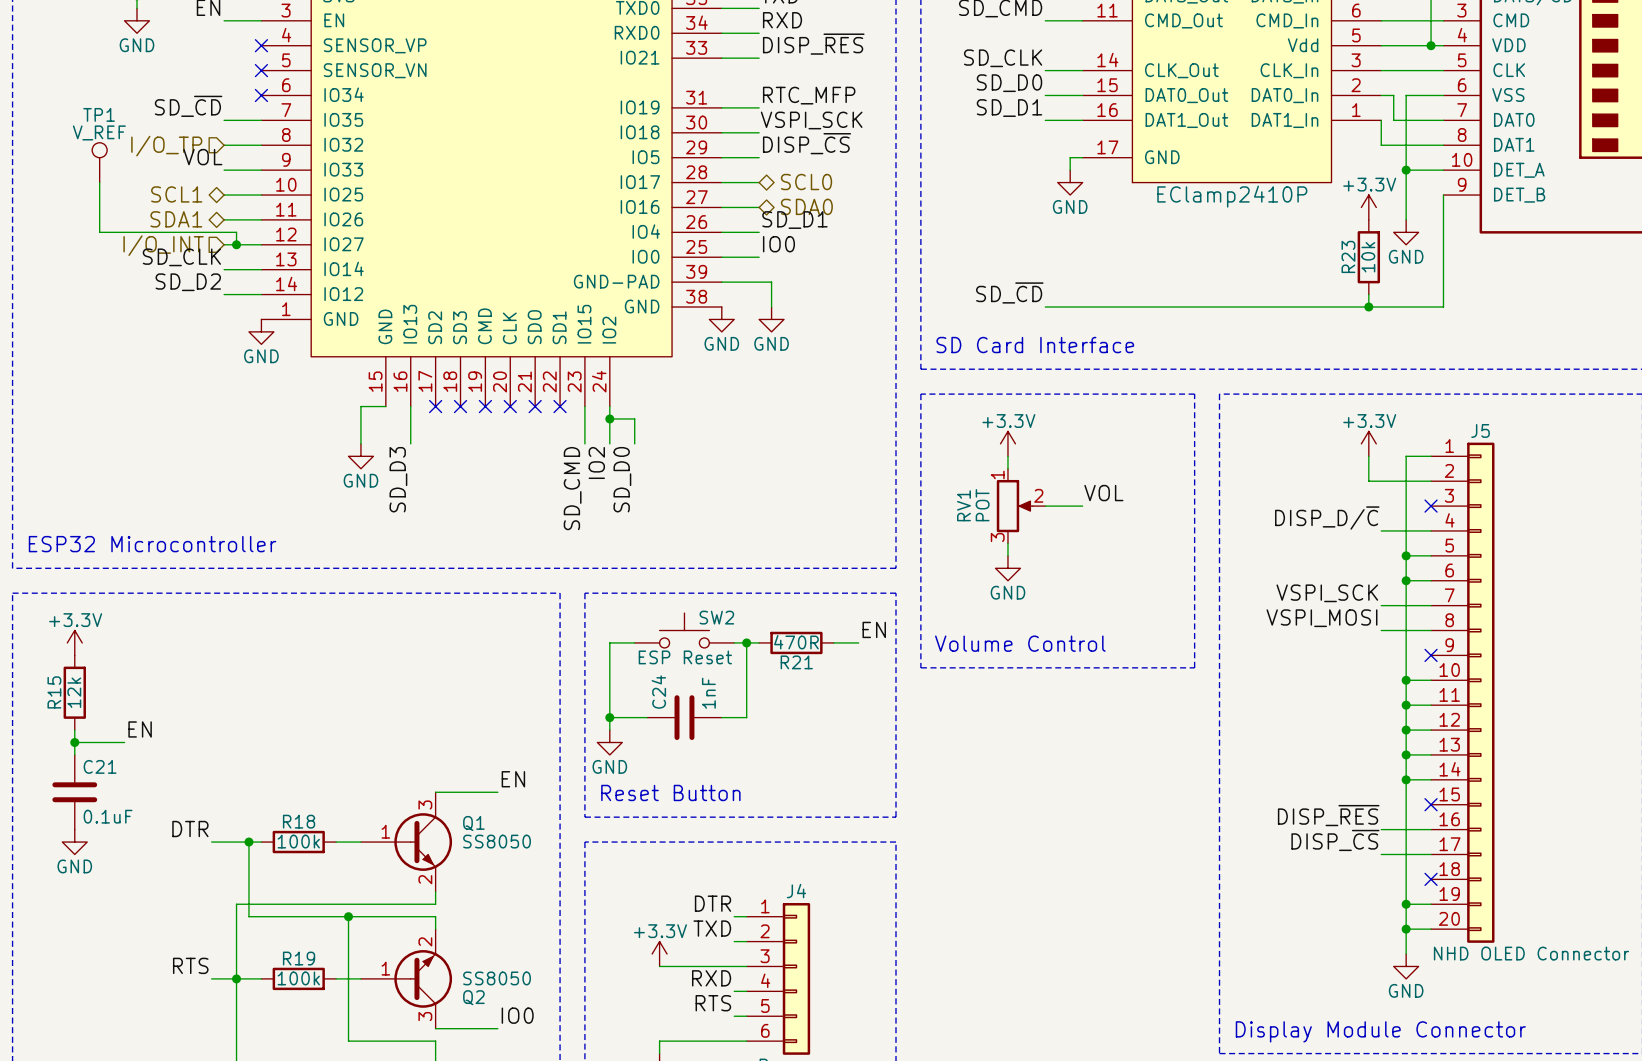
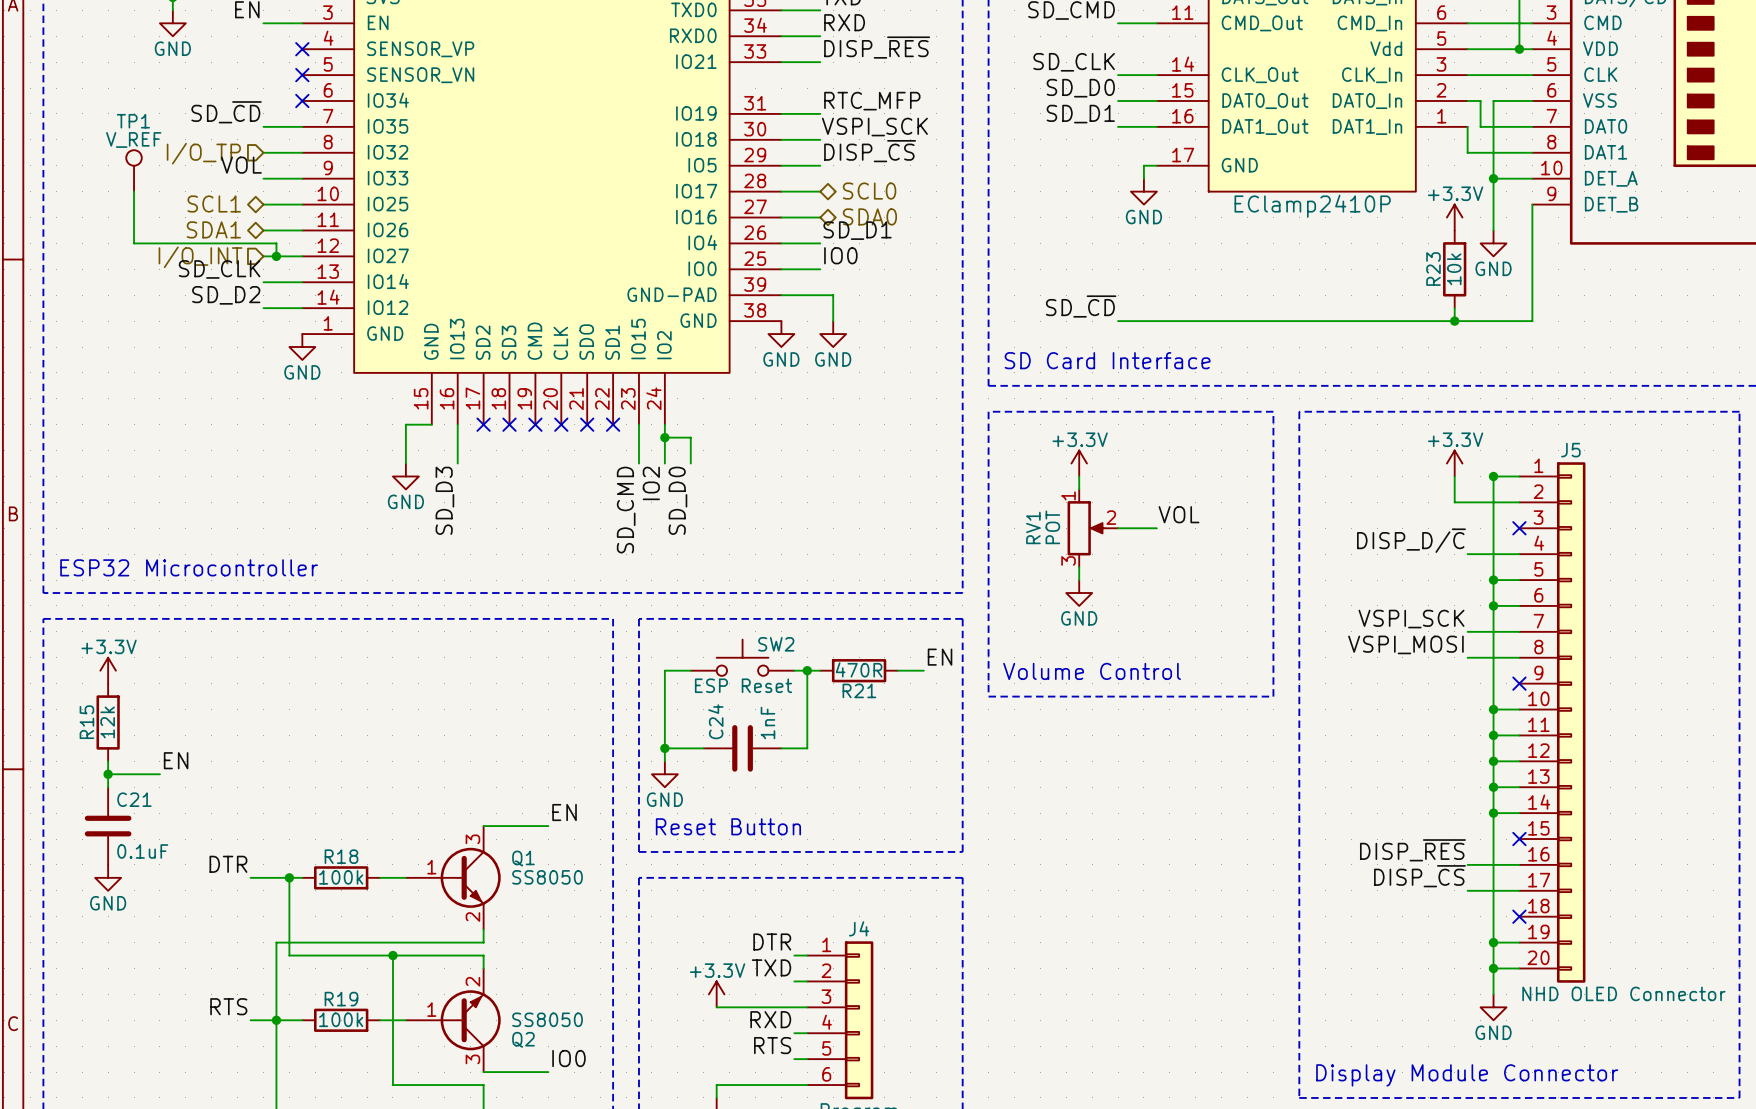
junction: none -> (1493, 476)

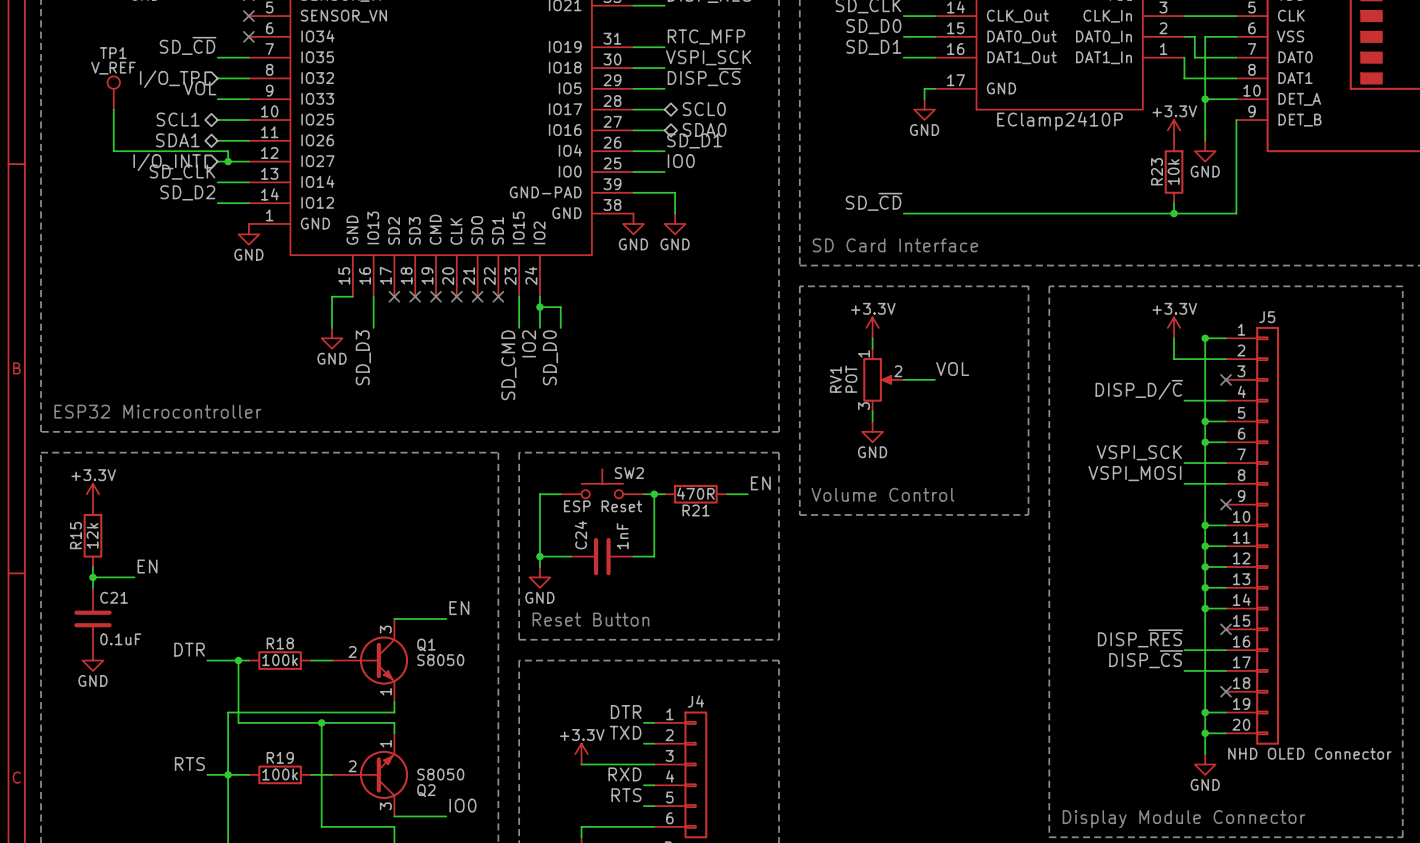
Q1 pin number: 1 (431, 867) -> 2 (352, 651)
Q1 value: SS8050 (547, 877) -> S8050 (440, 660)
Q1 pin number: 2 (472, 917) -> 1 (385, 691)
Q2 pin number: 2 (472, 981) -> 1 (385, 743)
Q2 pin number: 1 (431, 1009) -> 2 (352, 766)
Q2 value: SS8050 (547, 1019) -> S8050 (440, 774)

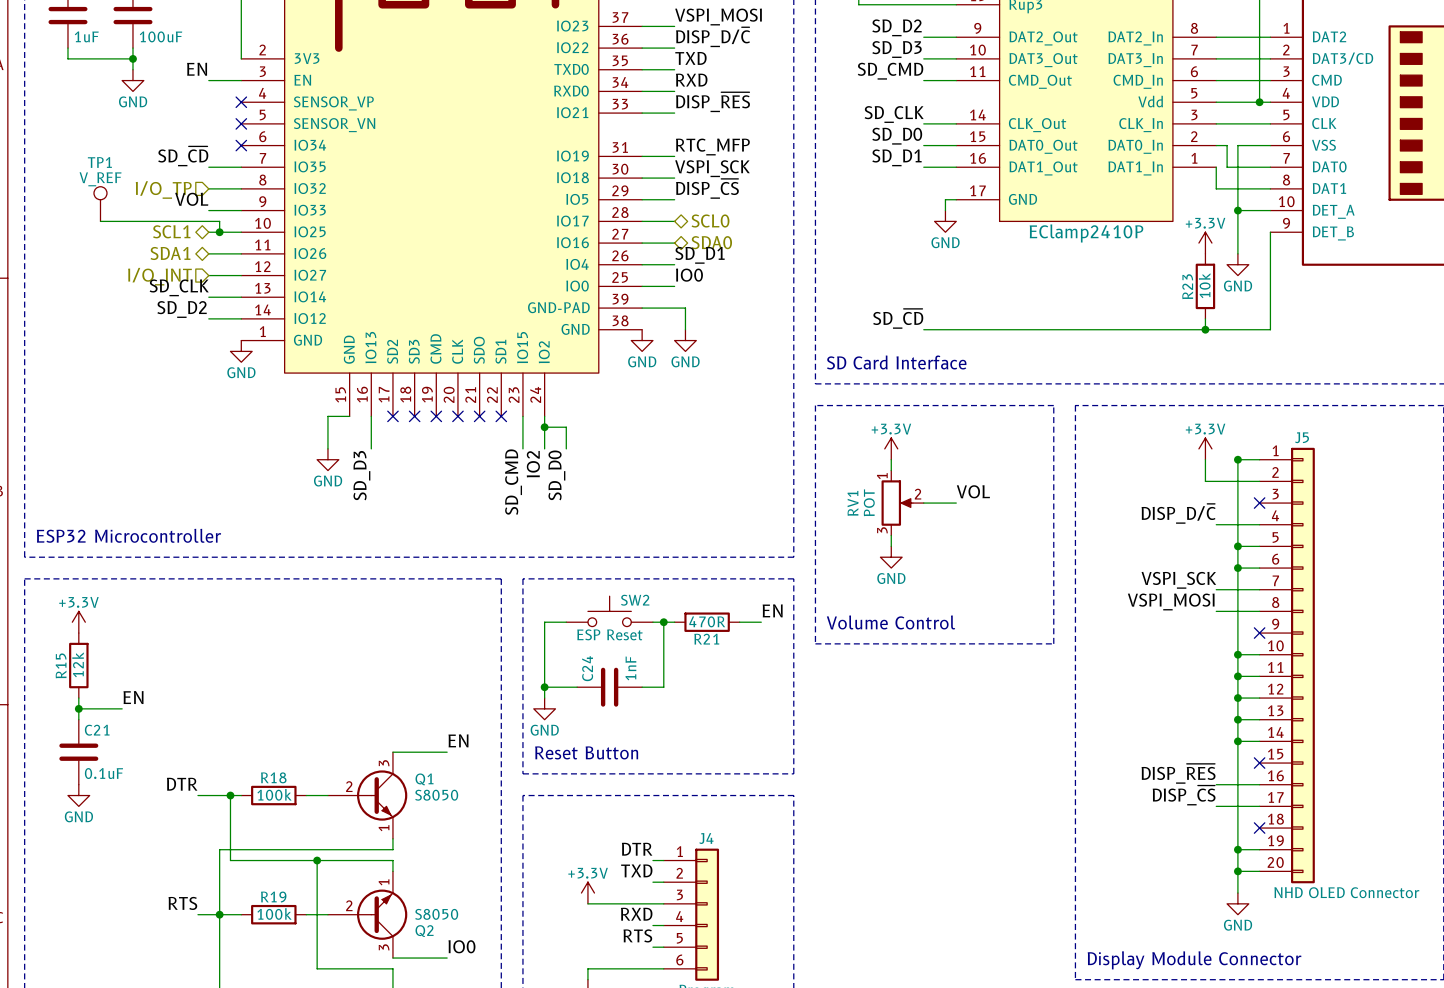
wire: (113, 109) (113, 151) (228, 151) (228, 161) -> (100, 221) (219, 221) (219, 232)
junction position: (228, 161) -> (219, 232)

